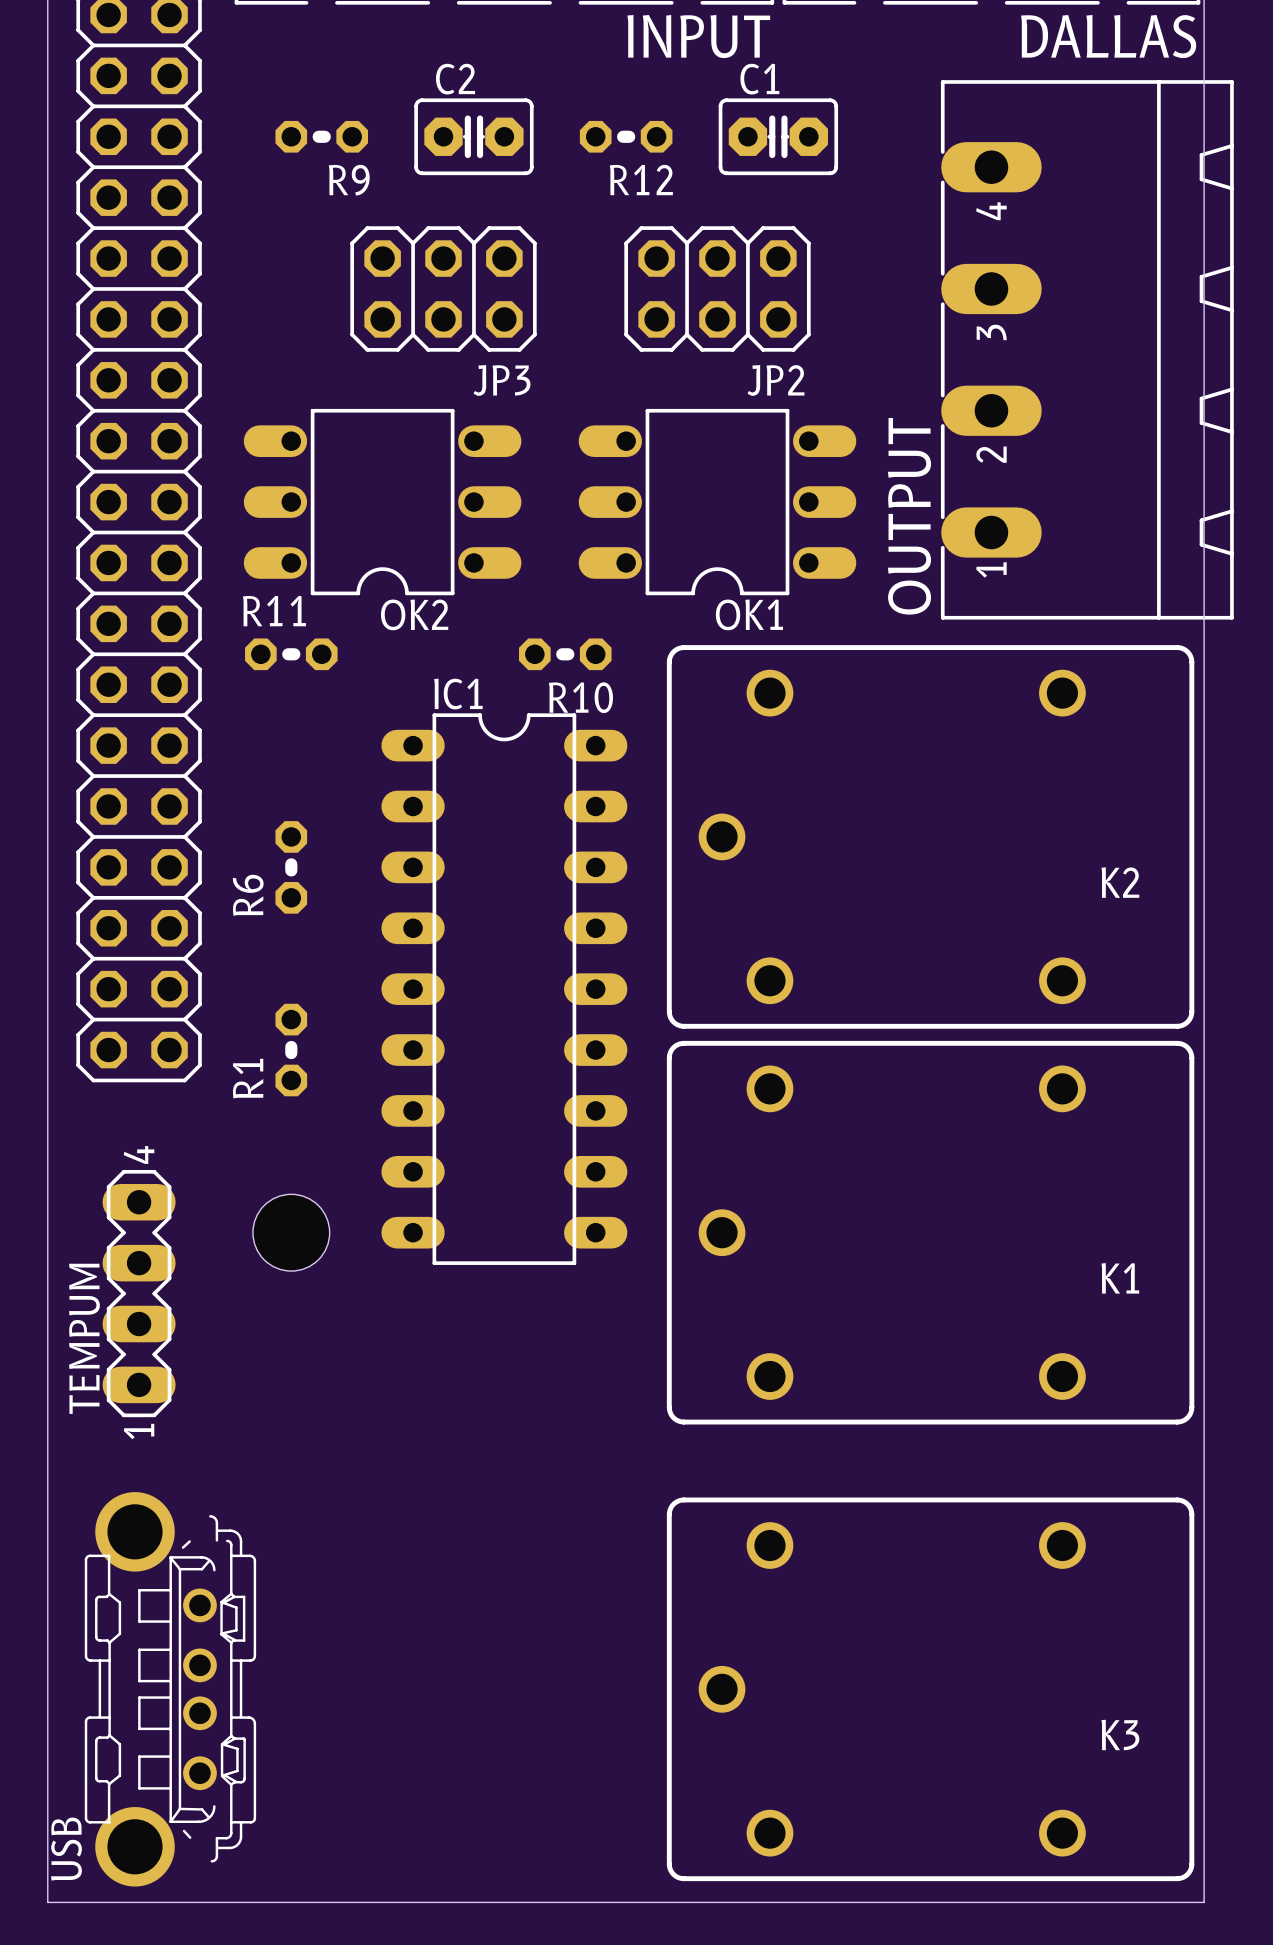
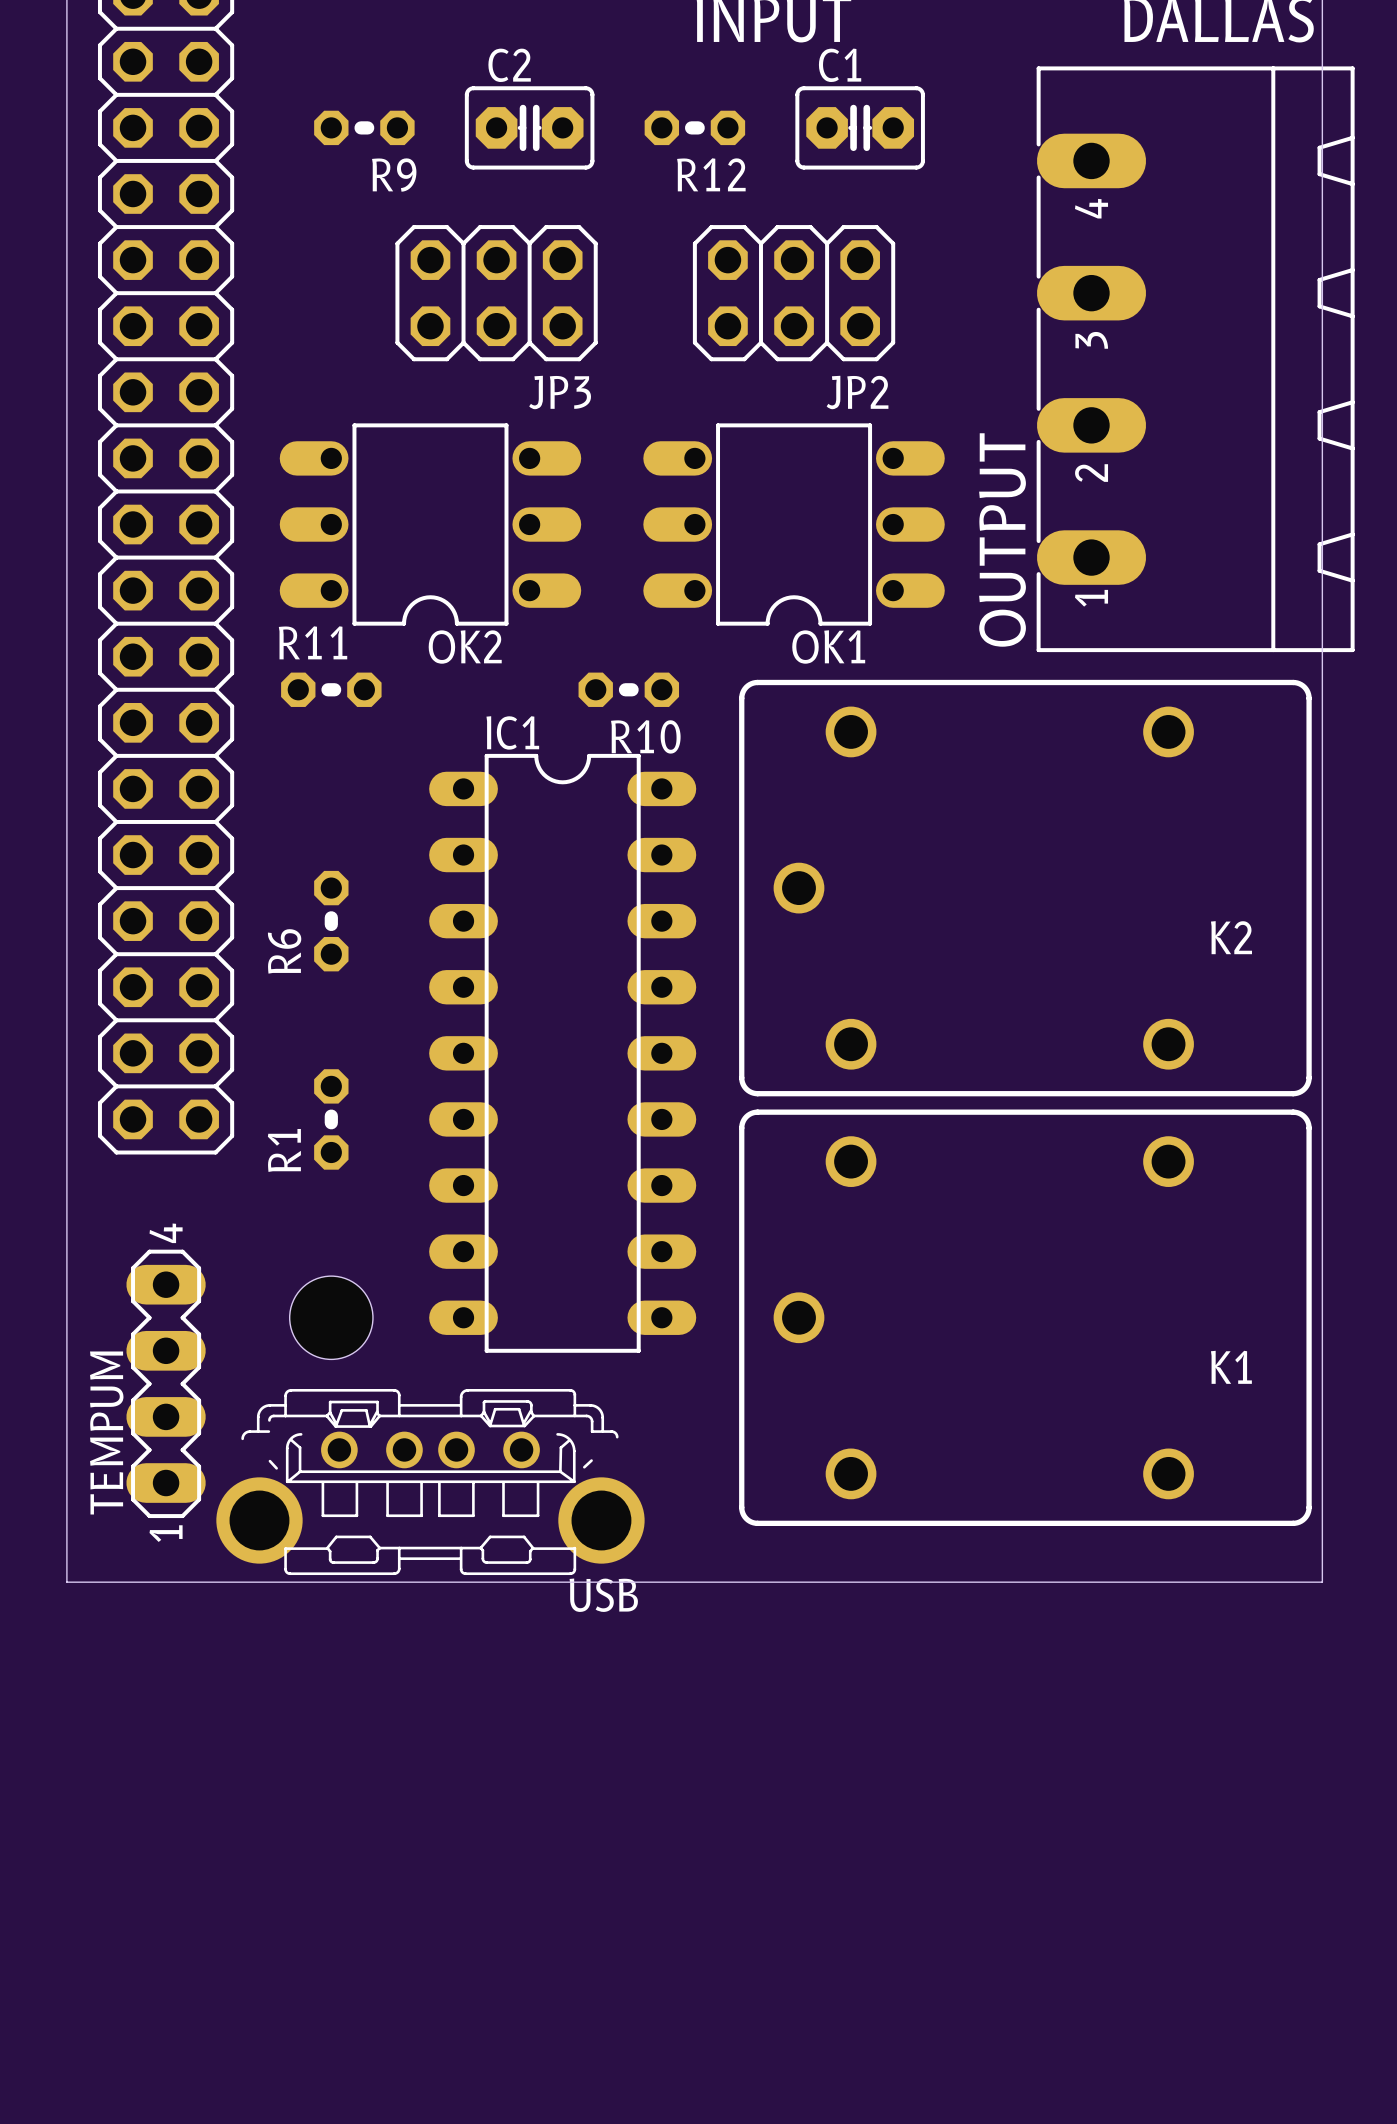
board edge: (47, 1476) (47, 1902) (1204, 1902) (1204, 1476) -> (66, 1582) (1322, 1582)
USB rotation: 0° (170, 1689) -> 90° counterclockwise (430, 1482)
USB position: (170, 1689) -> (430, 1482)
K3: (930, 1689) -> none

